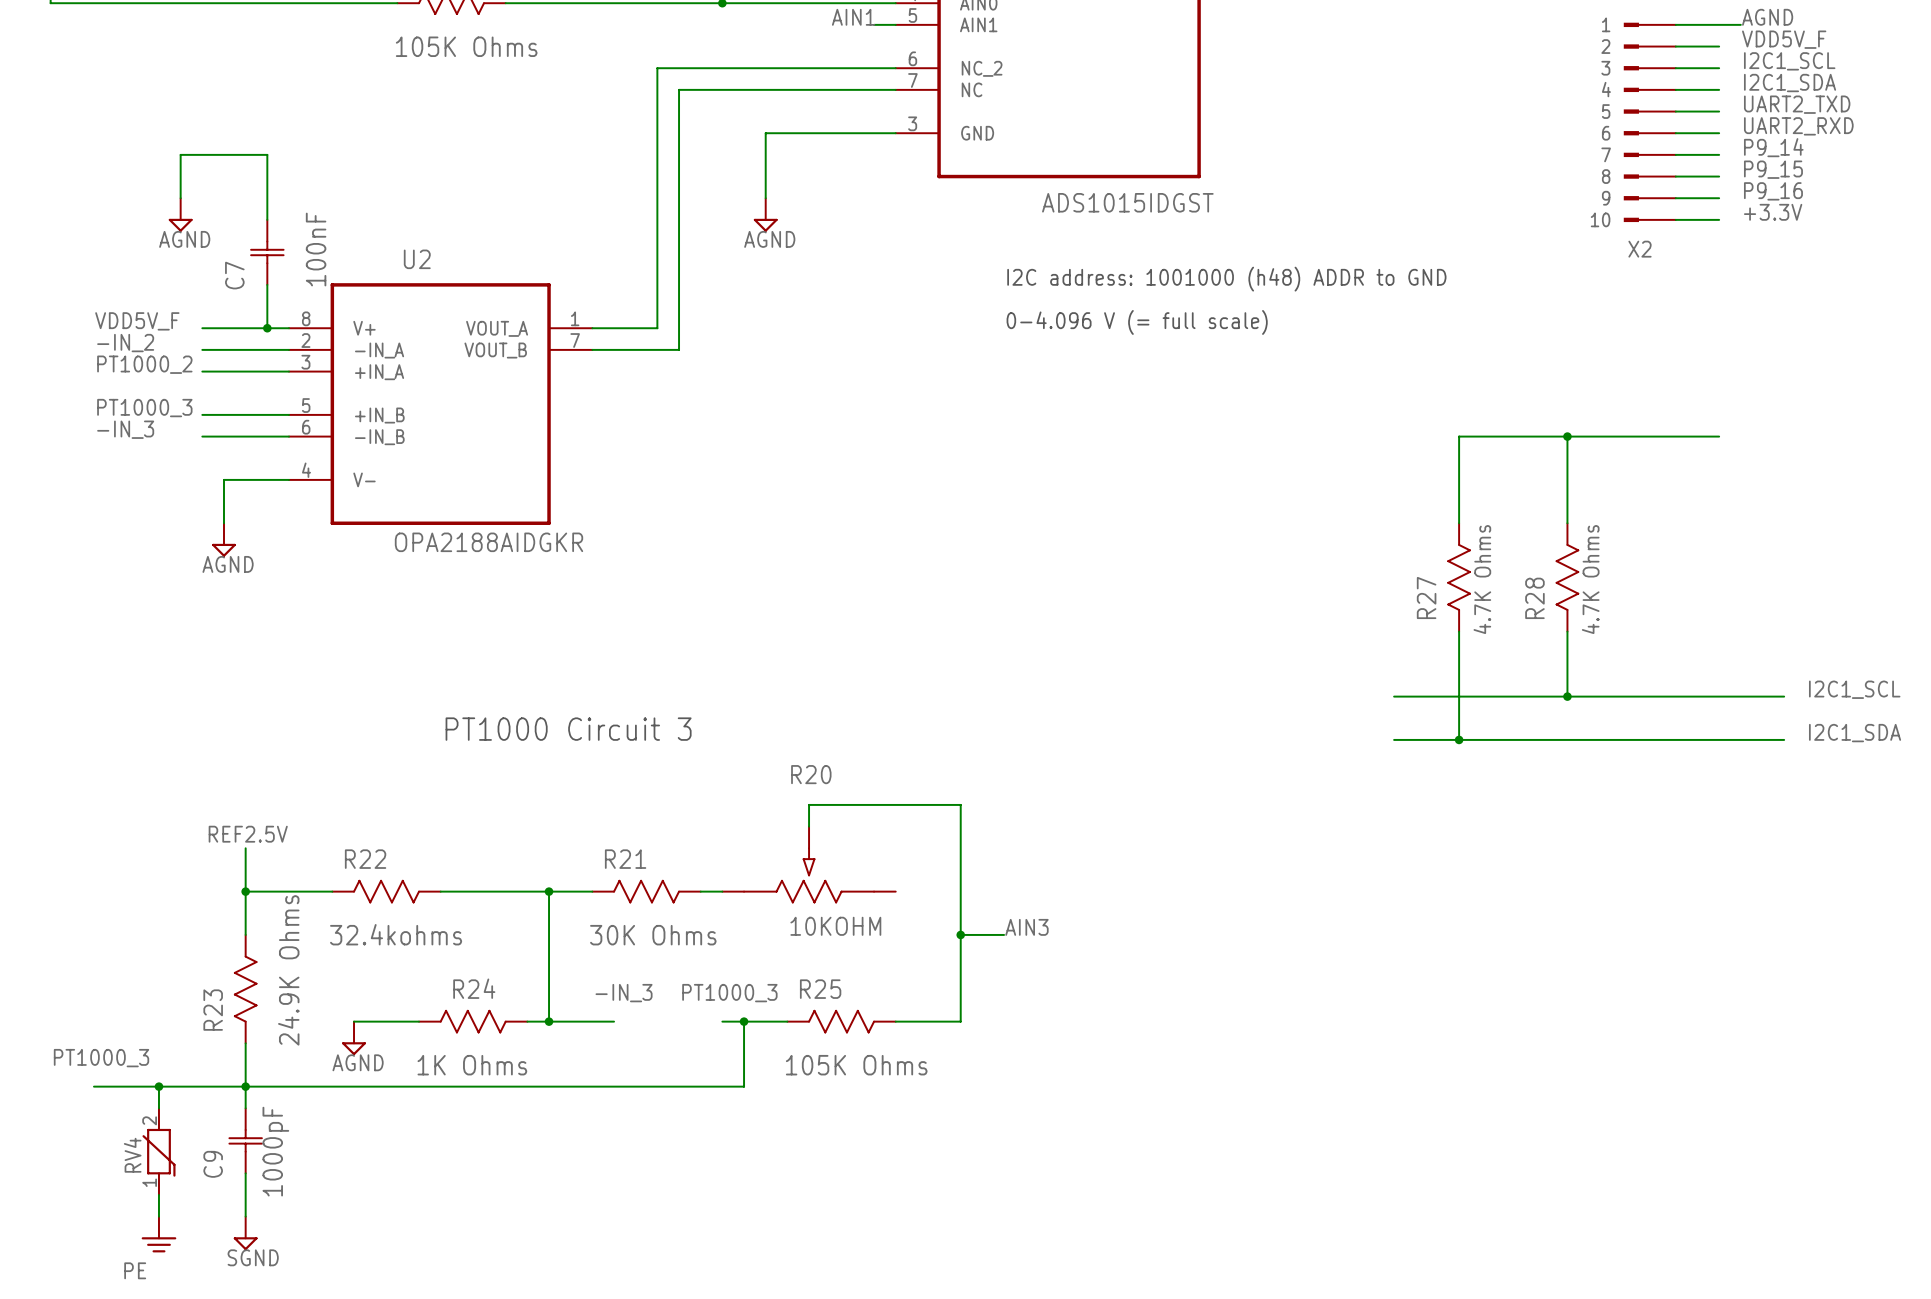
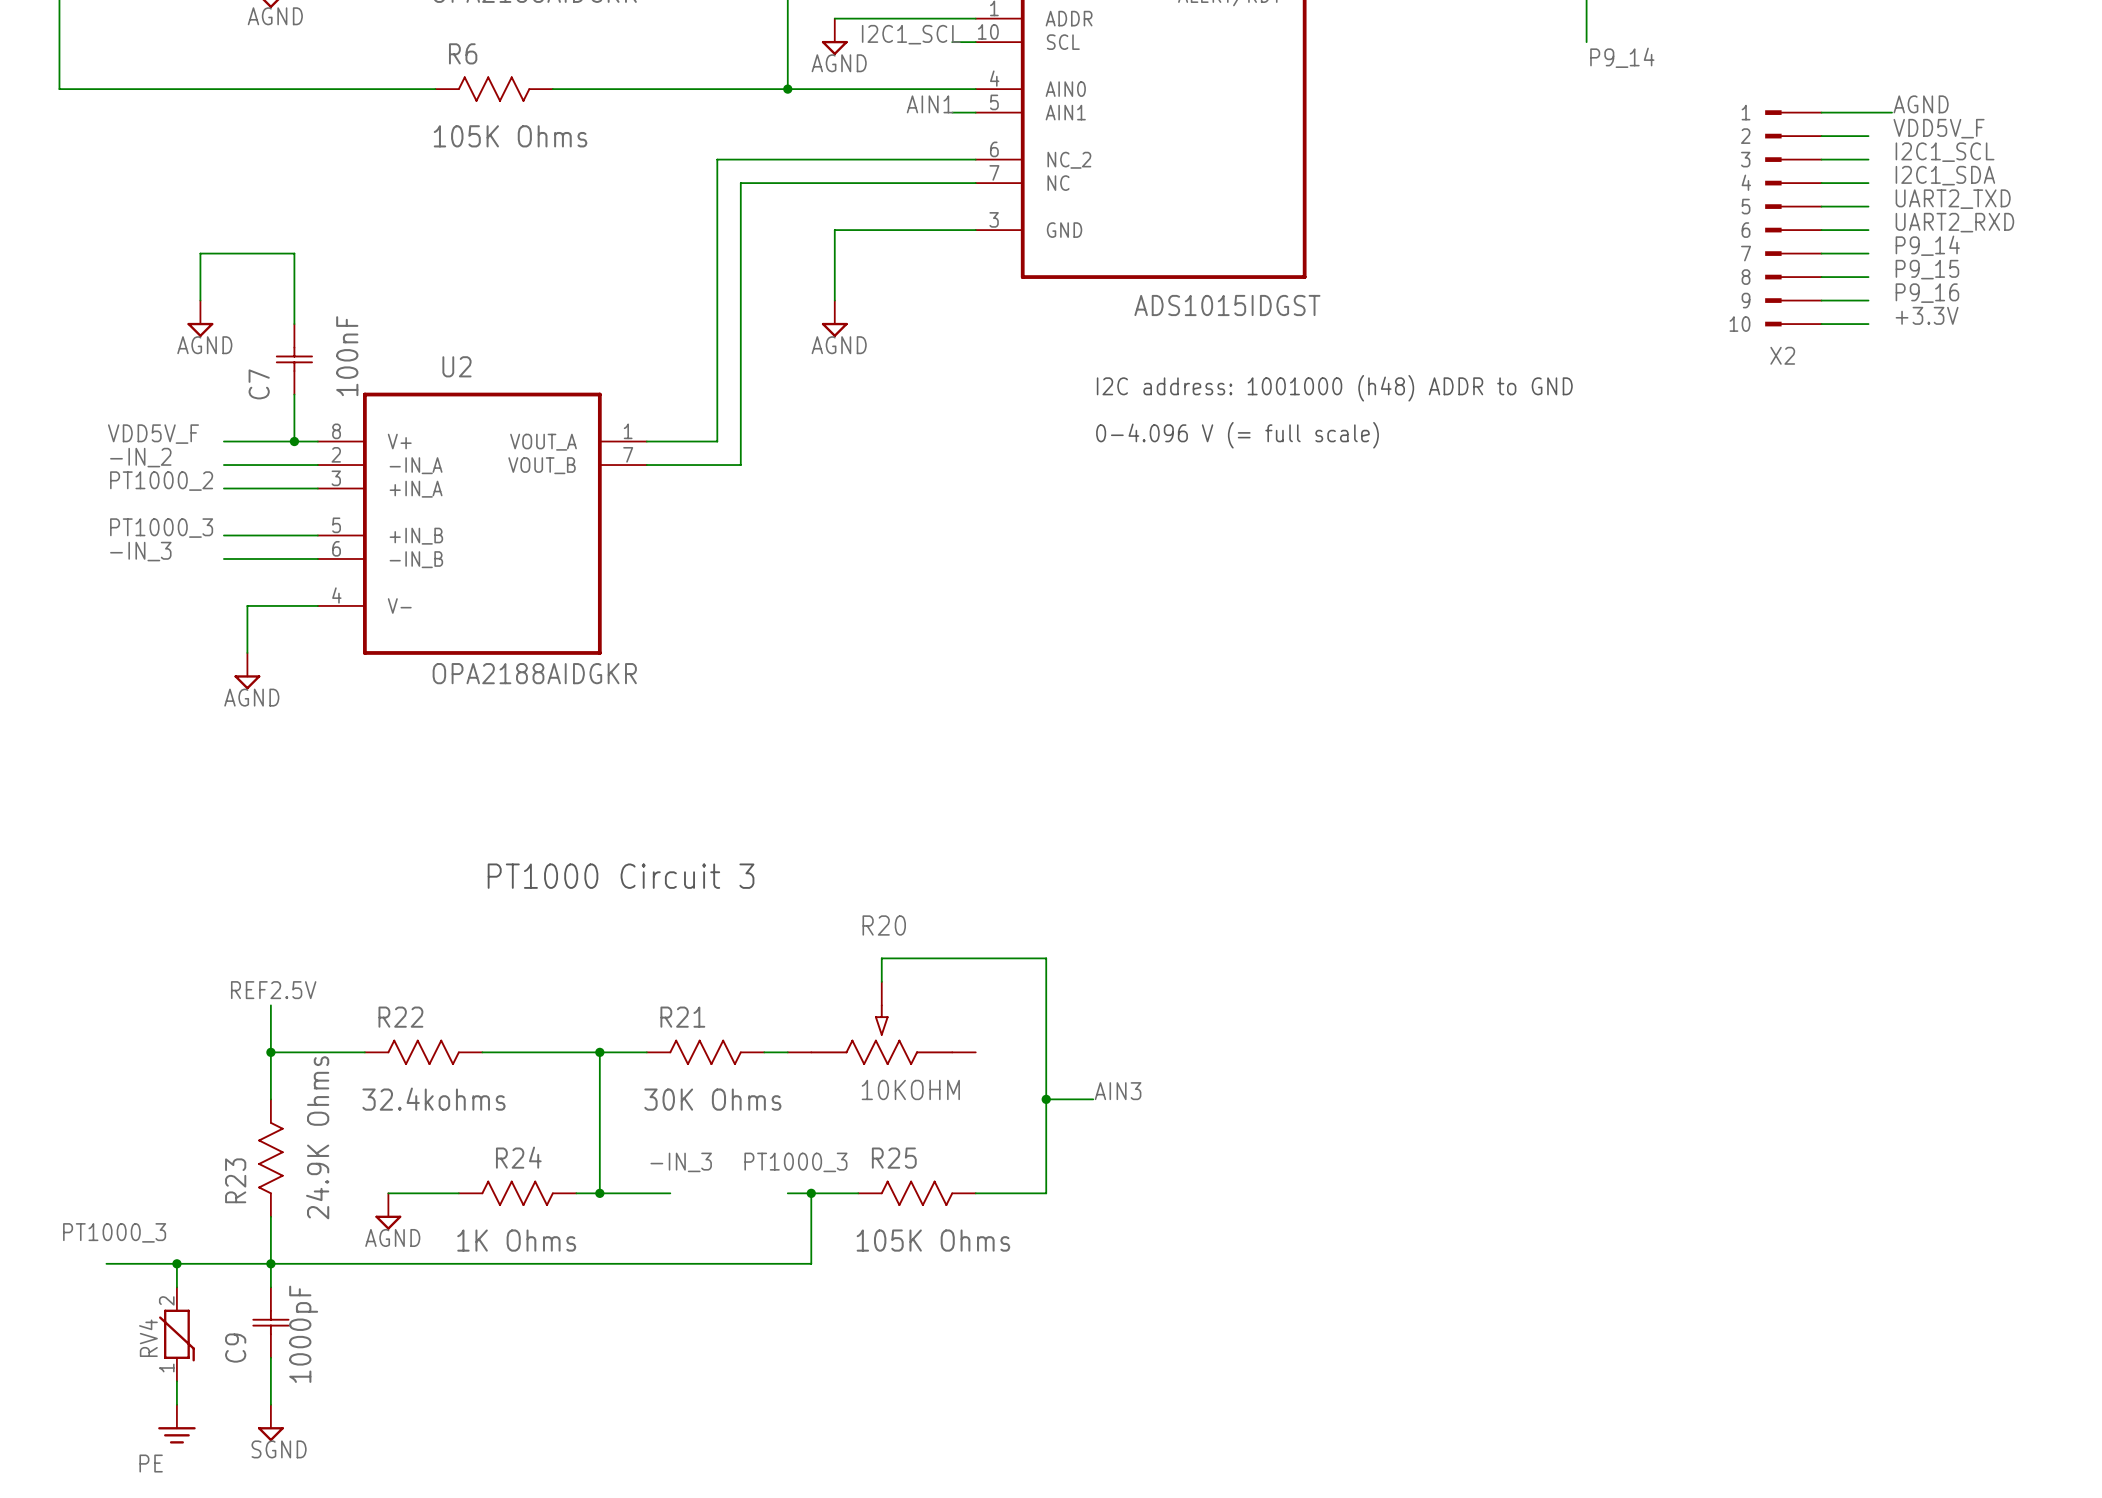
wire: (1567, 436) (1567, 523) -> none
junction: (1567, 436) -> none
wire: (1719, 436) (1459, 436) (1459, 523) -> none
R27: 4.7K Ohms (1459, 577) -> none
R28: 4.7K Ohms (1567, 577) -> none
wire: (1459, 631) (1459, 739) -> none
wire: (1567, 631) (1567, 696) -> none
label: I2C1_SCL (1854, 689) -> none
wire: (1394, 696) (1784, 696) -> none
junction: (1567, 696) -> none
label: I2C1_SDA (1855, 733) -> none
wire: (1394, 739) (1784, 739) -> none
junction: (1459, 739) -> none

